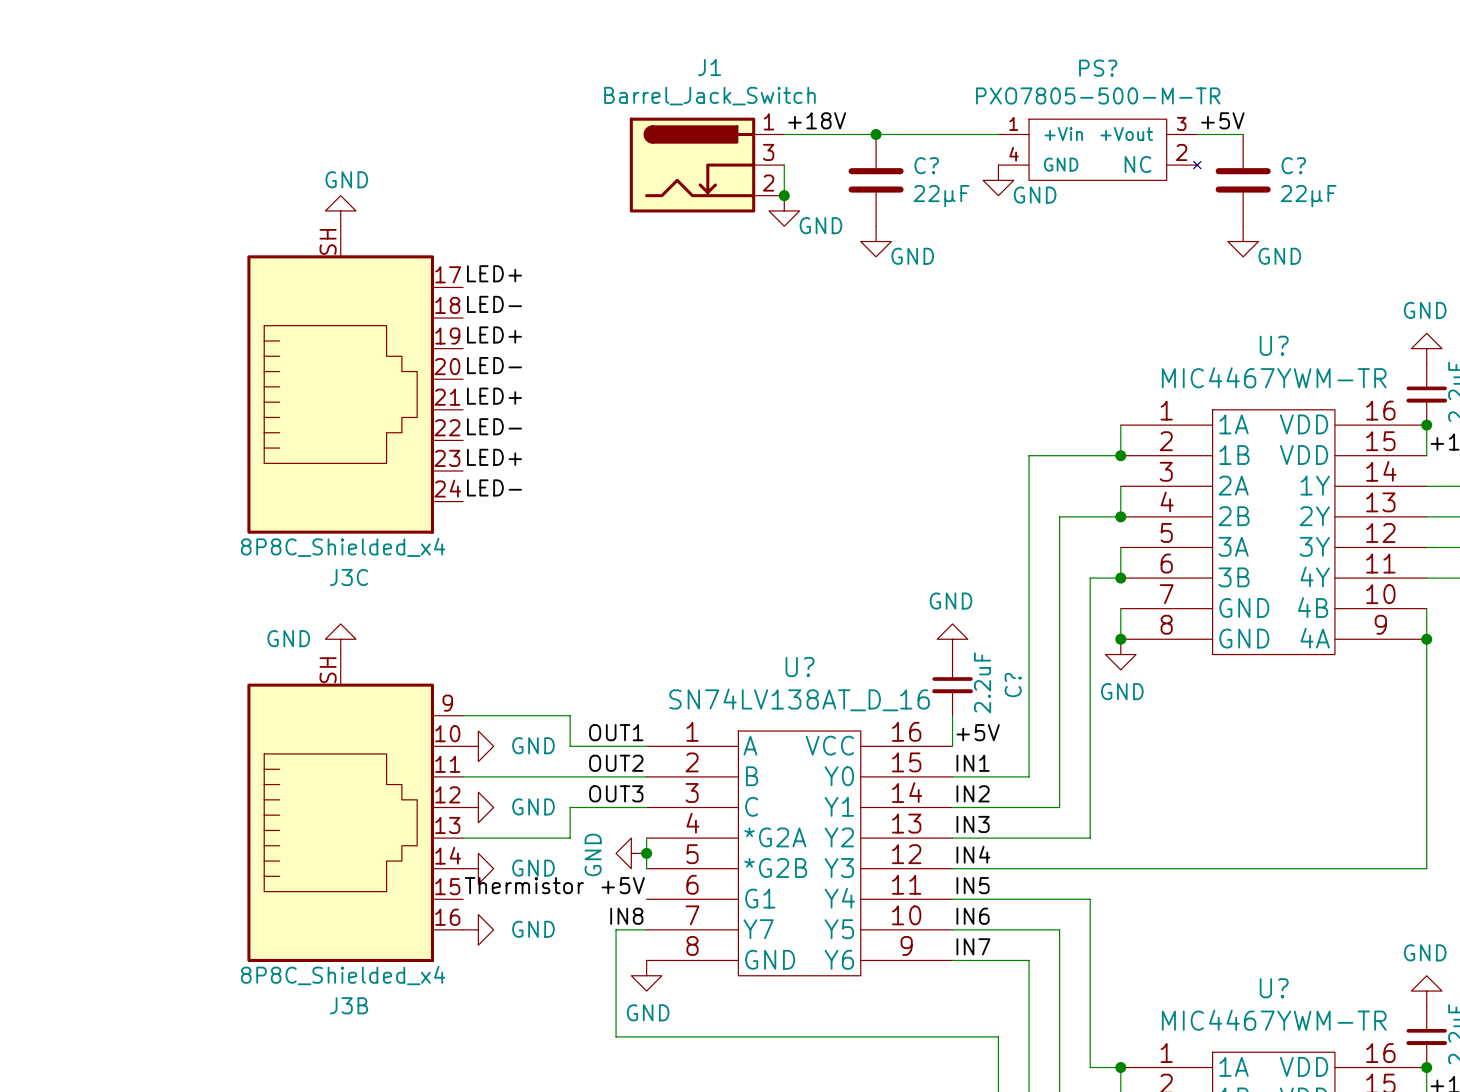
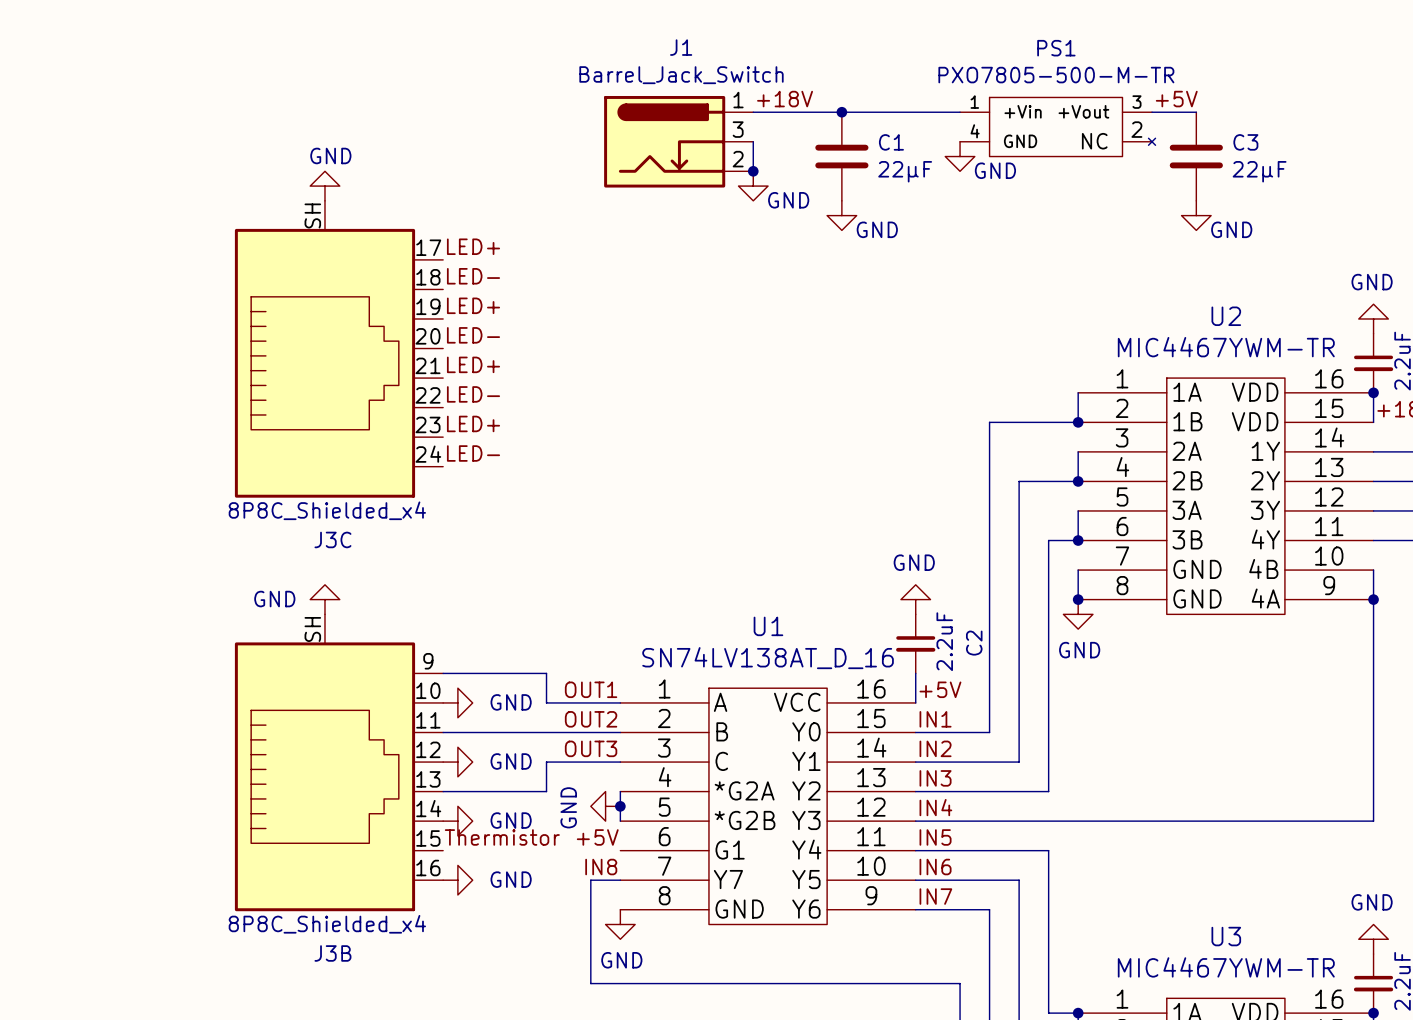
PS? name: PS? (1098, 68) -> PS1 (1056, 48)
C? name: C? (926, 165) -> C1 (891, 142)
C? name: C? (1293, 165) -> C3 (1245, 142)
U? name: U? (1274, 345) -> U2 (1226, 316)
U? name: U? (800, 667) -> U1 (768, 626)
C? name: C? (1013, 685) -> C2 (974, 643)
U? name: U? (1274, 988) -> U3 (1226, 936)

